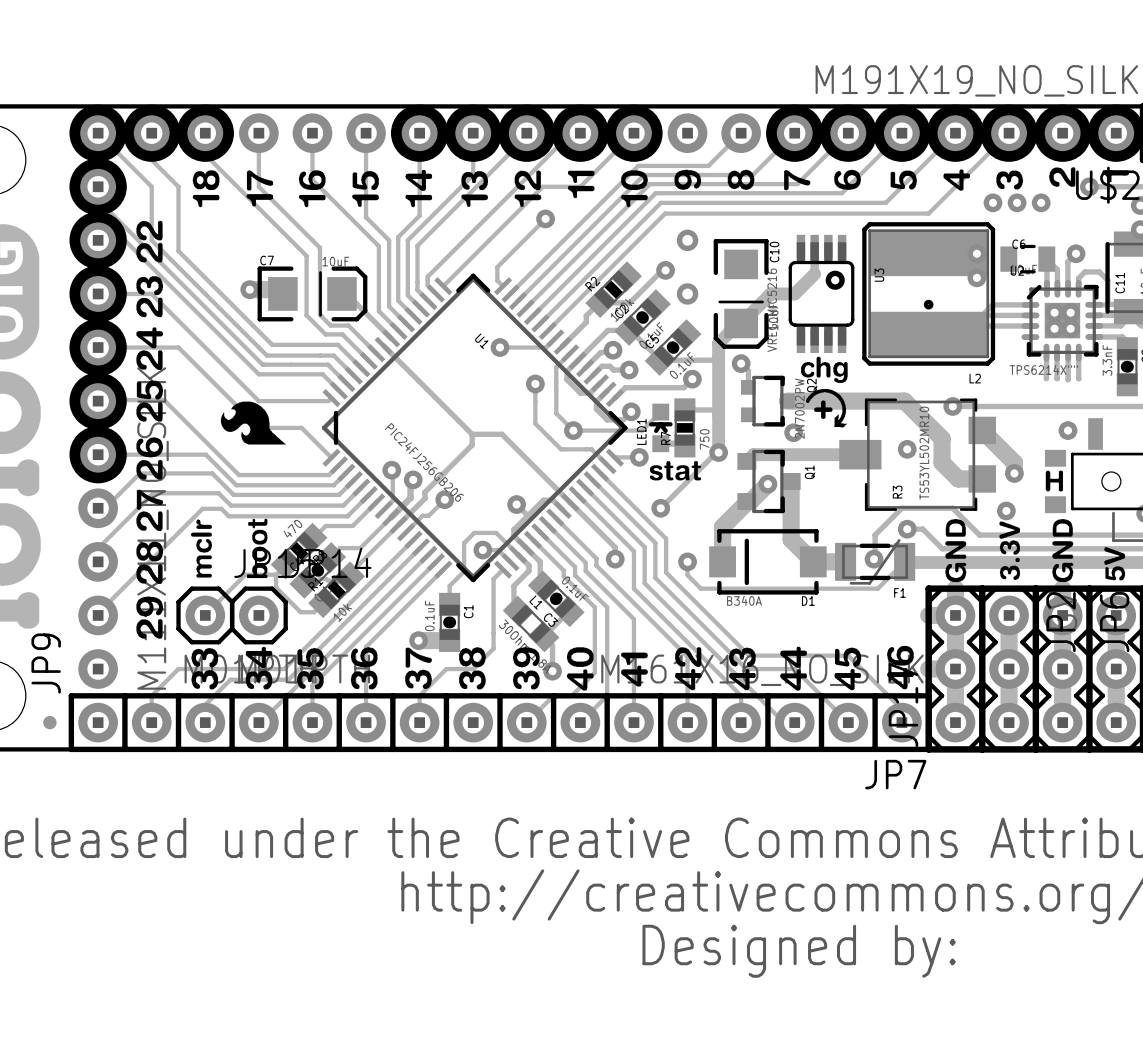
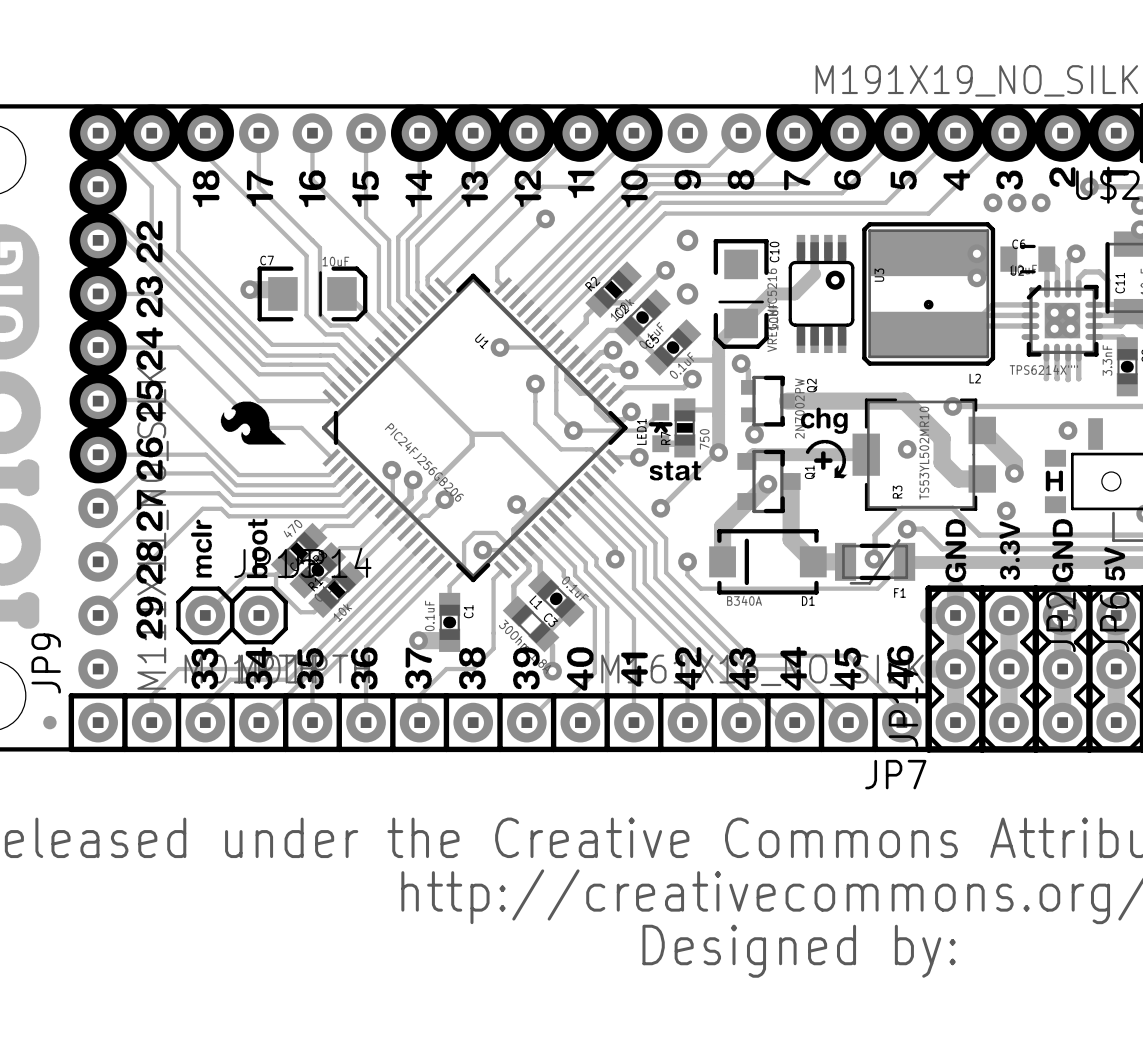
drawing: [801, 356, 848, 428] -> none
R3 footprint: [839, 398, 996, 511] -> [852, 398, 996, 511]
drawing: none -> [801, 407, 848, 479]
via position: (793, 432) -> (754, 434)

